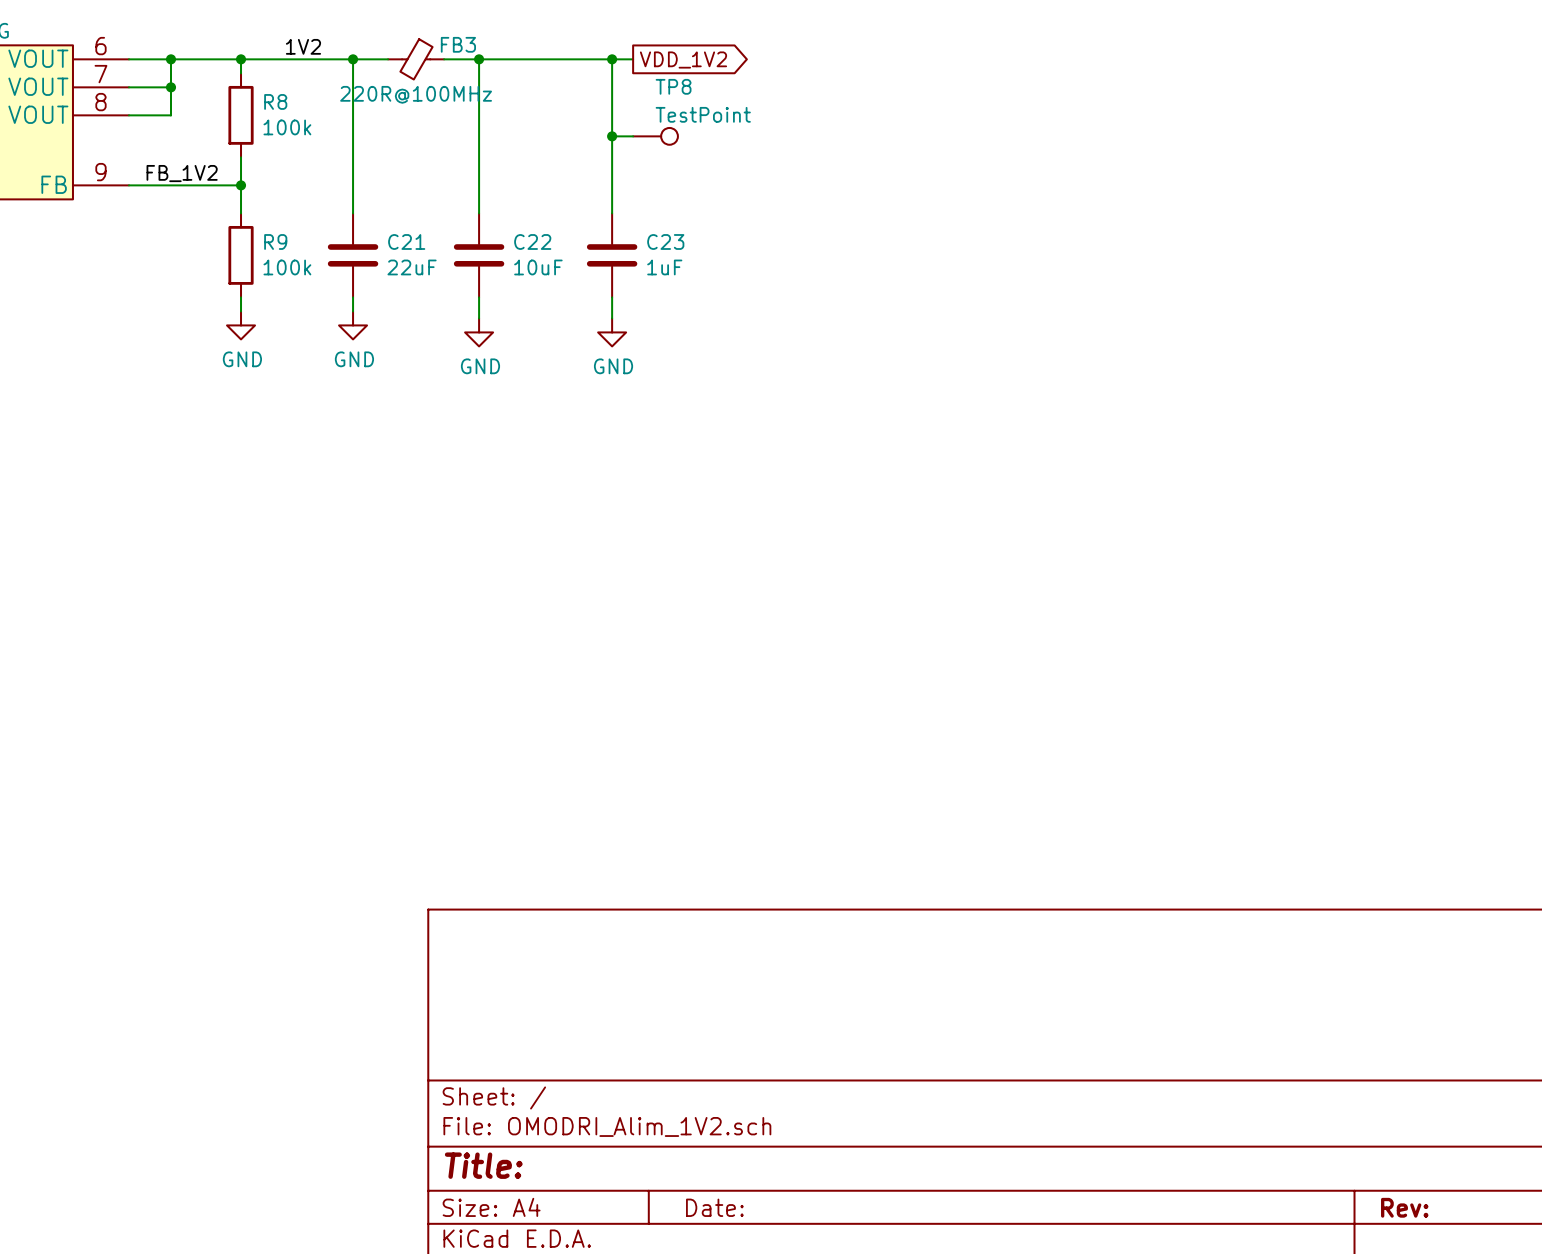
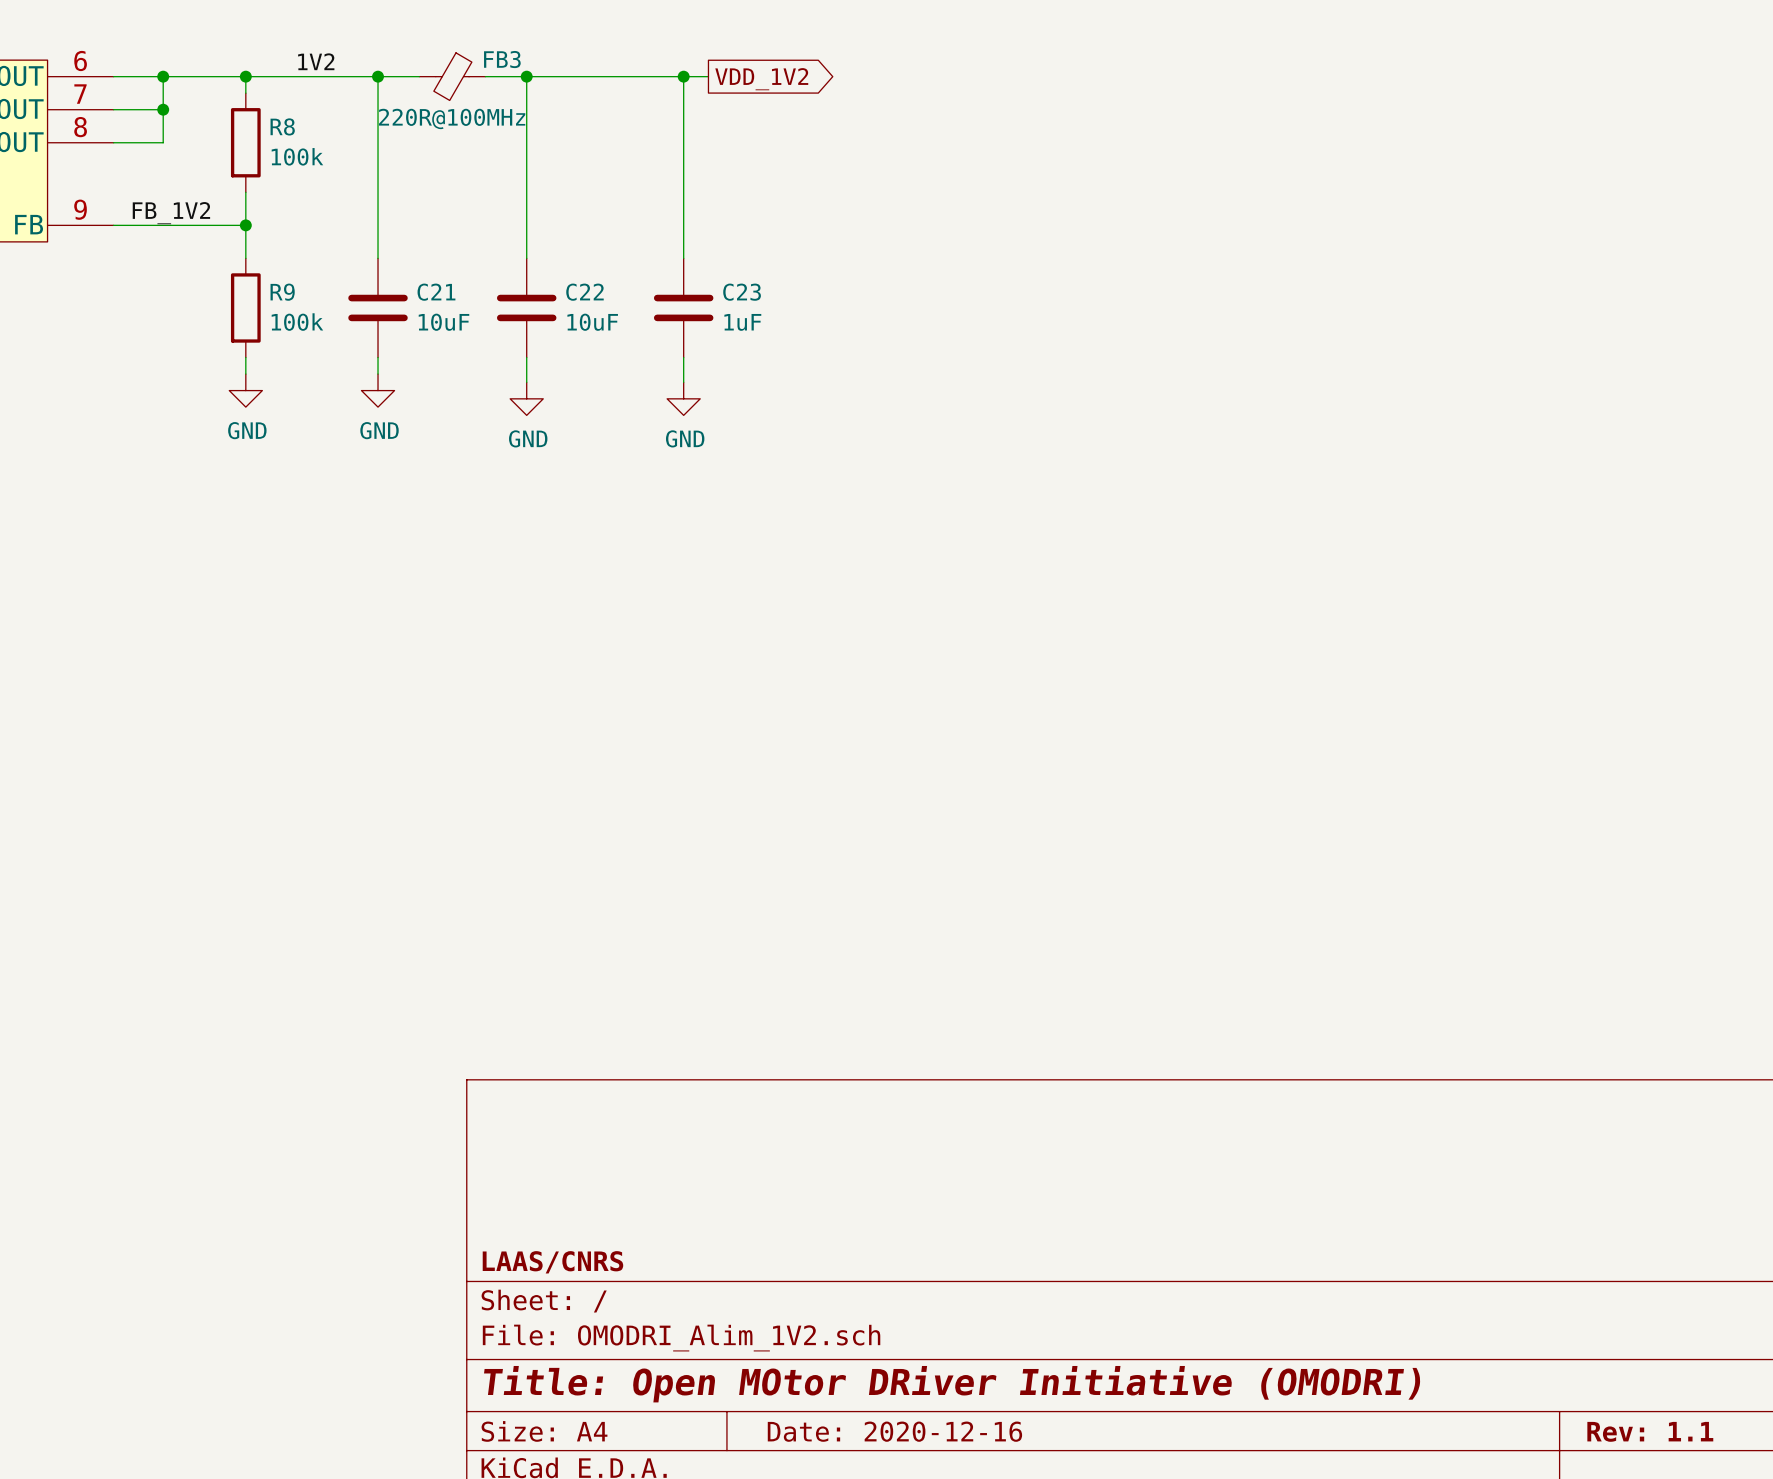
wire: (612, 136) (633, 136) -> none
junction: (612, 136) -> none
TP8: TestPoint (655, 136) -> none
C21 value: 22uF (412, 267) -> 10uF (443, 322)
title block: none -> LAAS/CNRS (552, 1262)
title block: Title: (483, 1165) -> Title: Open MOtor DRiver Initiative (OMODRI) (952, 1384)
title block: Date: (714, 1207) -> Date: 2020-12-16 (894, 1431)
title block: Rev: (1404, 1207) -> Rev: 1.1 (1650, 1431)

